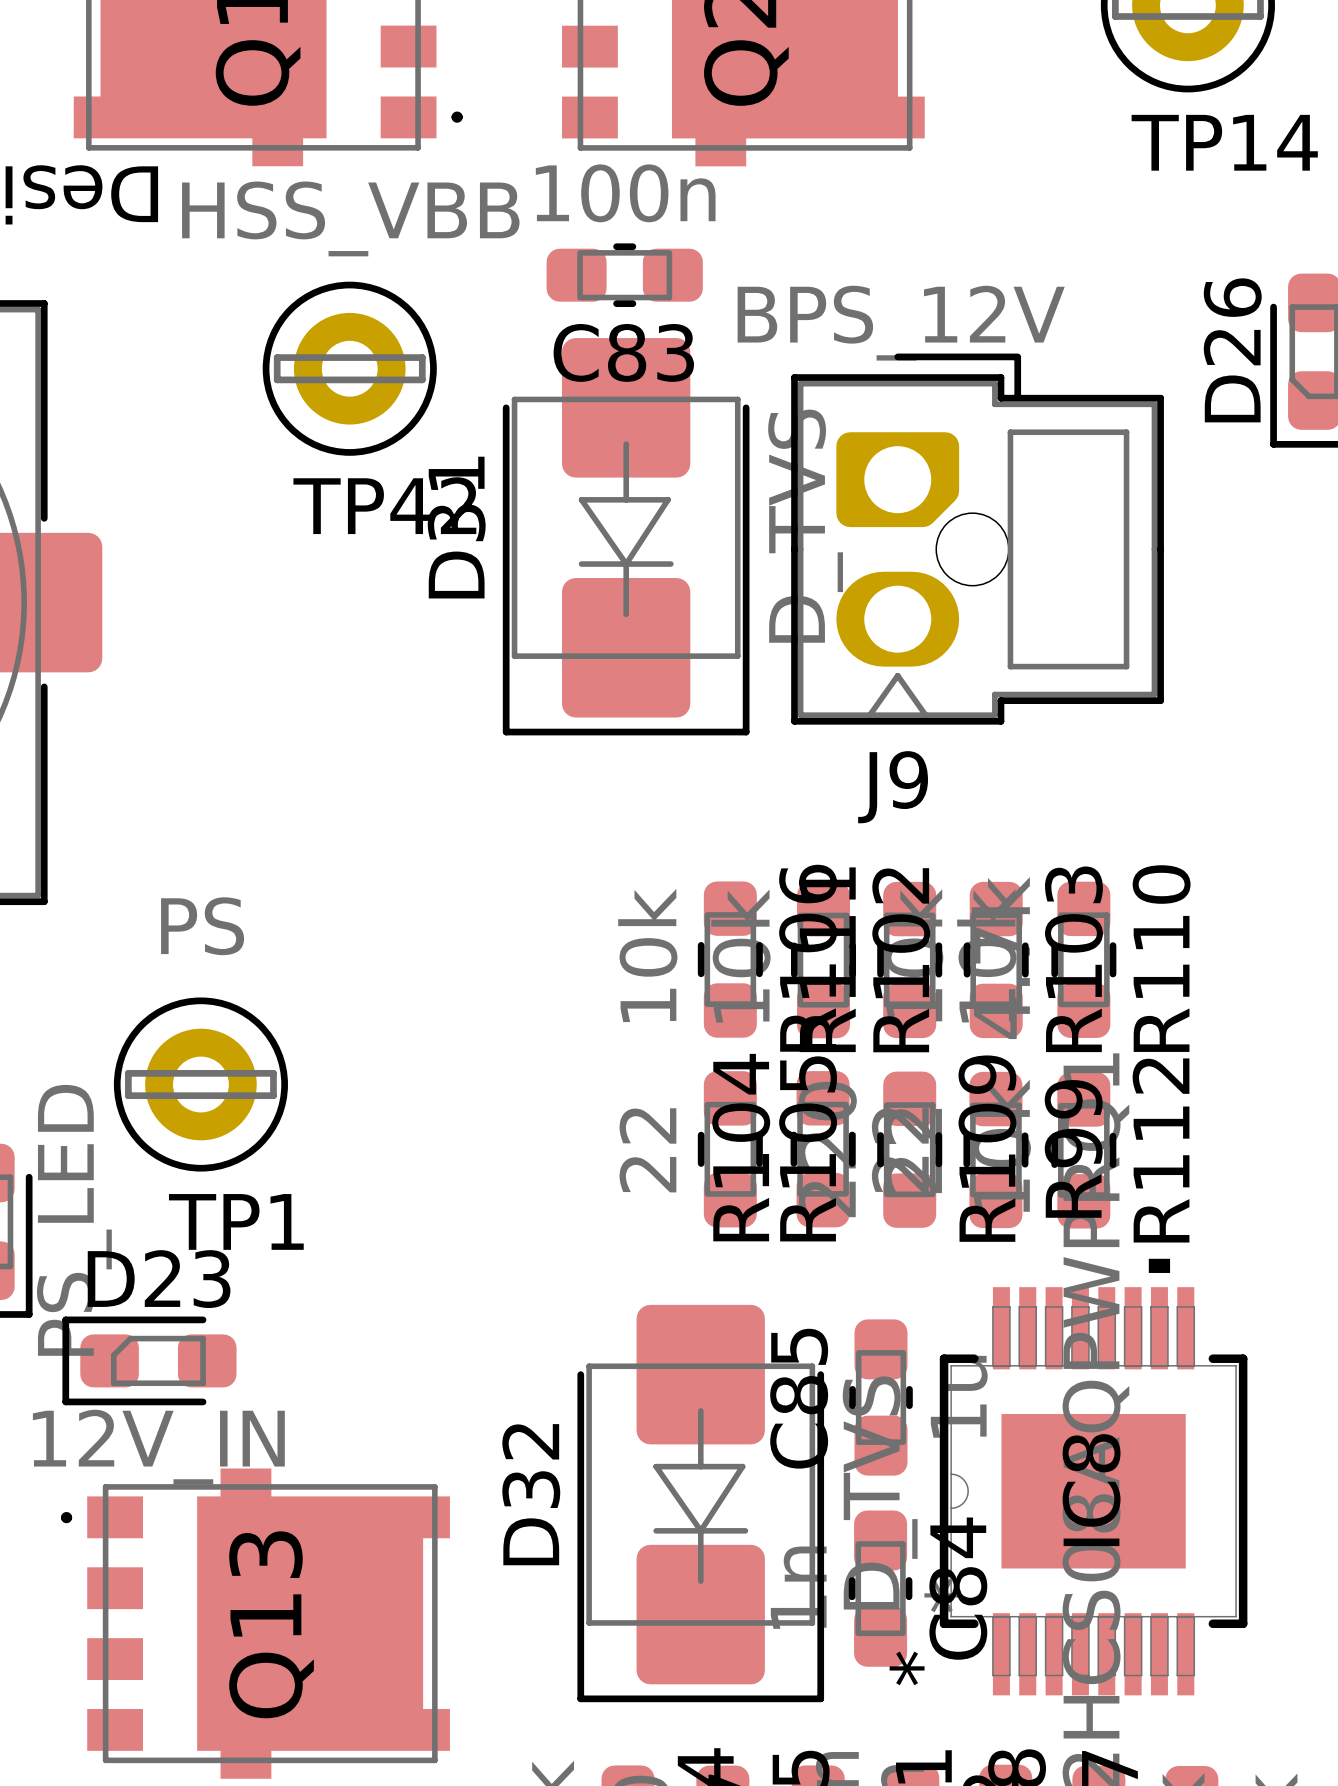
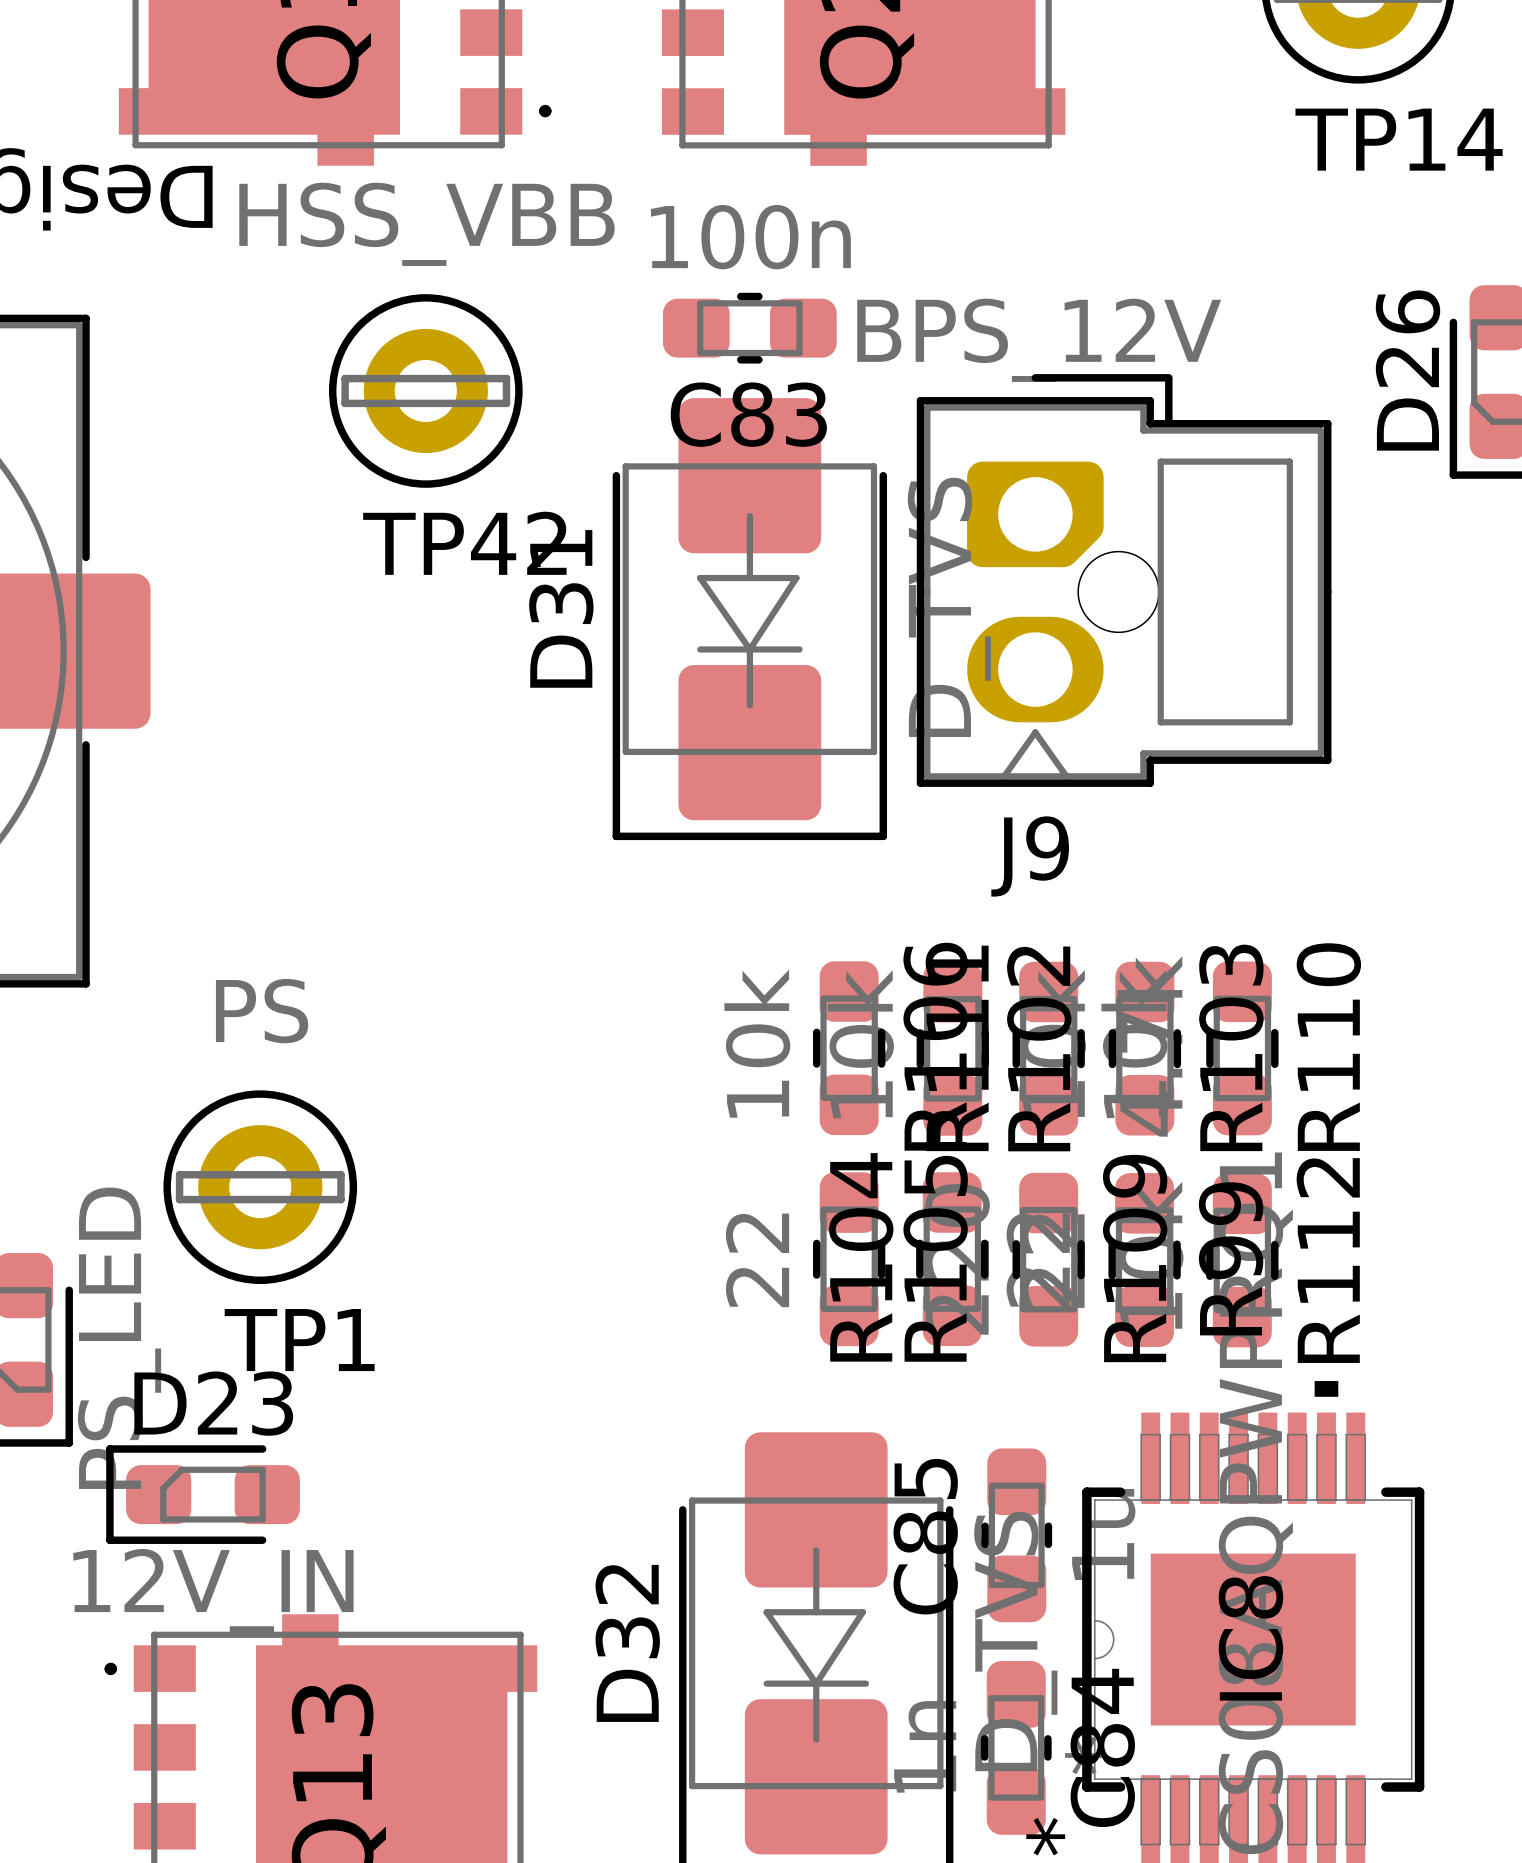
C83 position: (624, 275) -> (749, 328)
D31 position: (626, 536) -> (749, 619)

